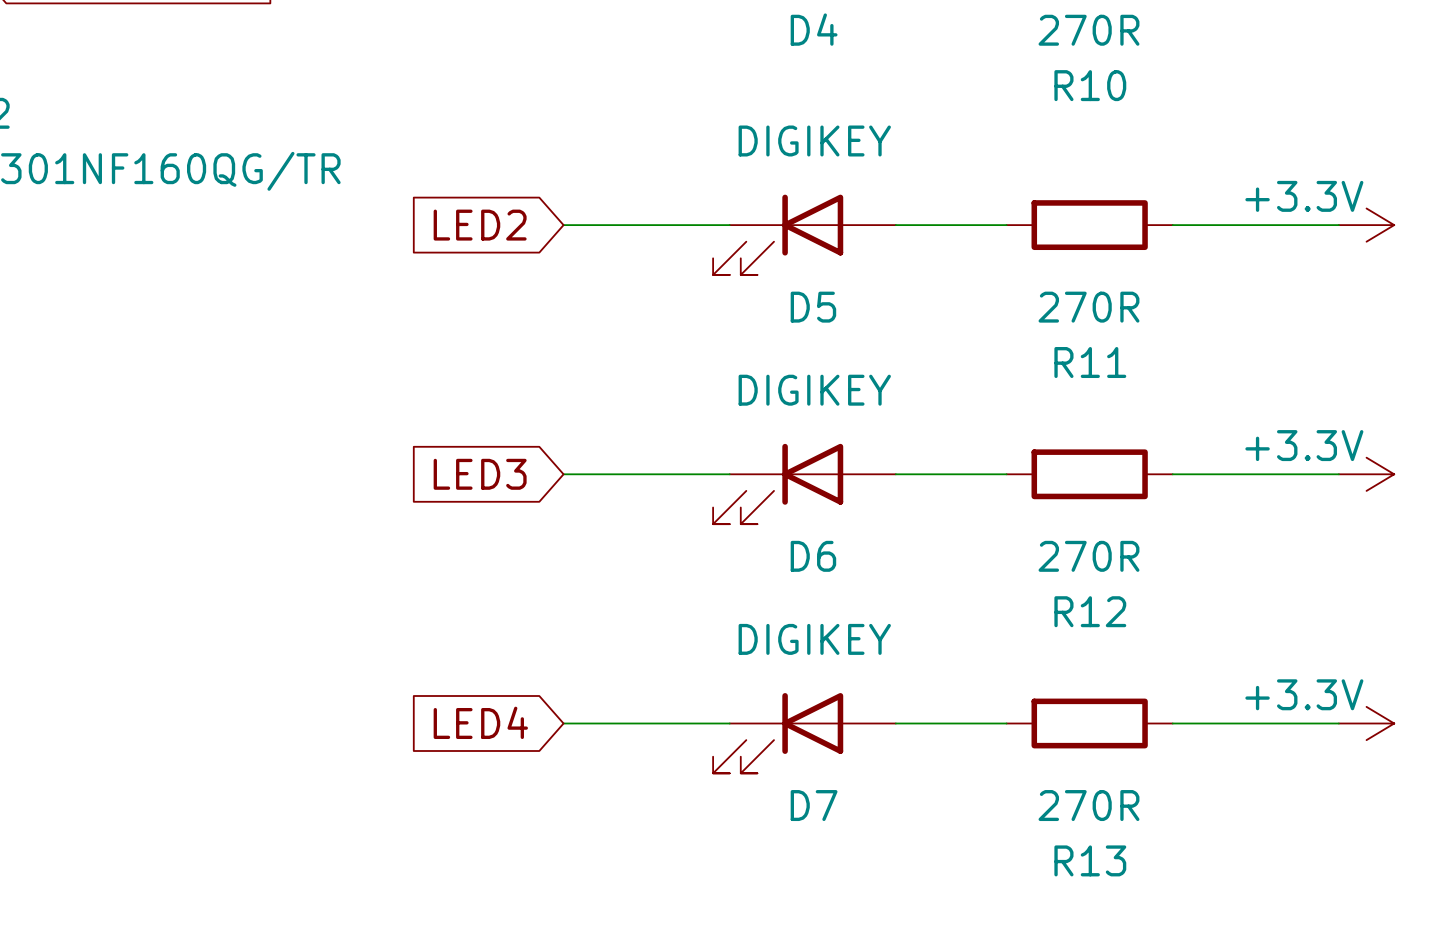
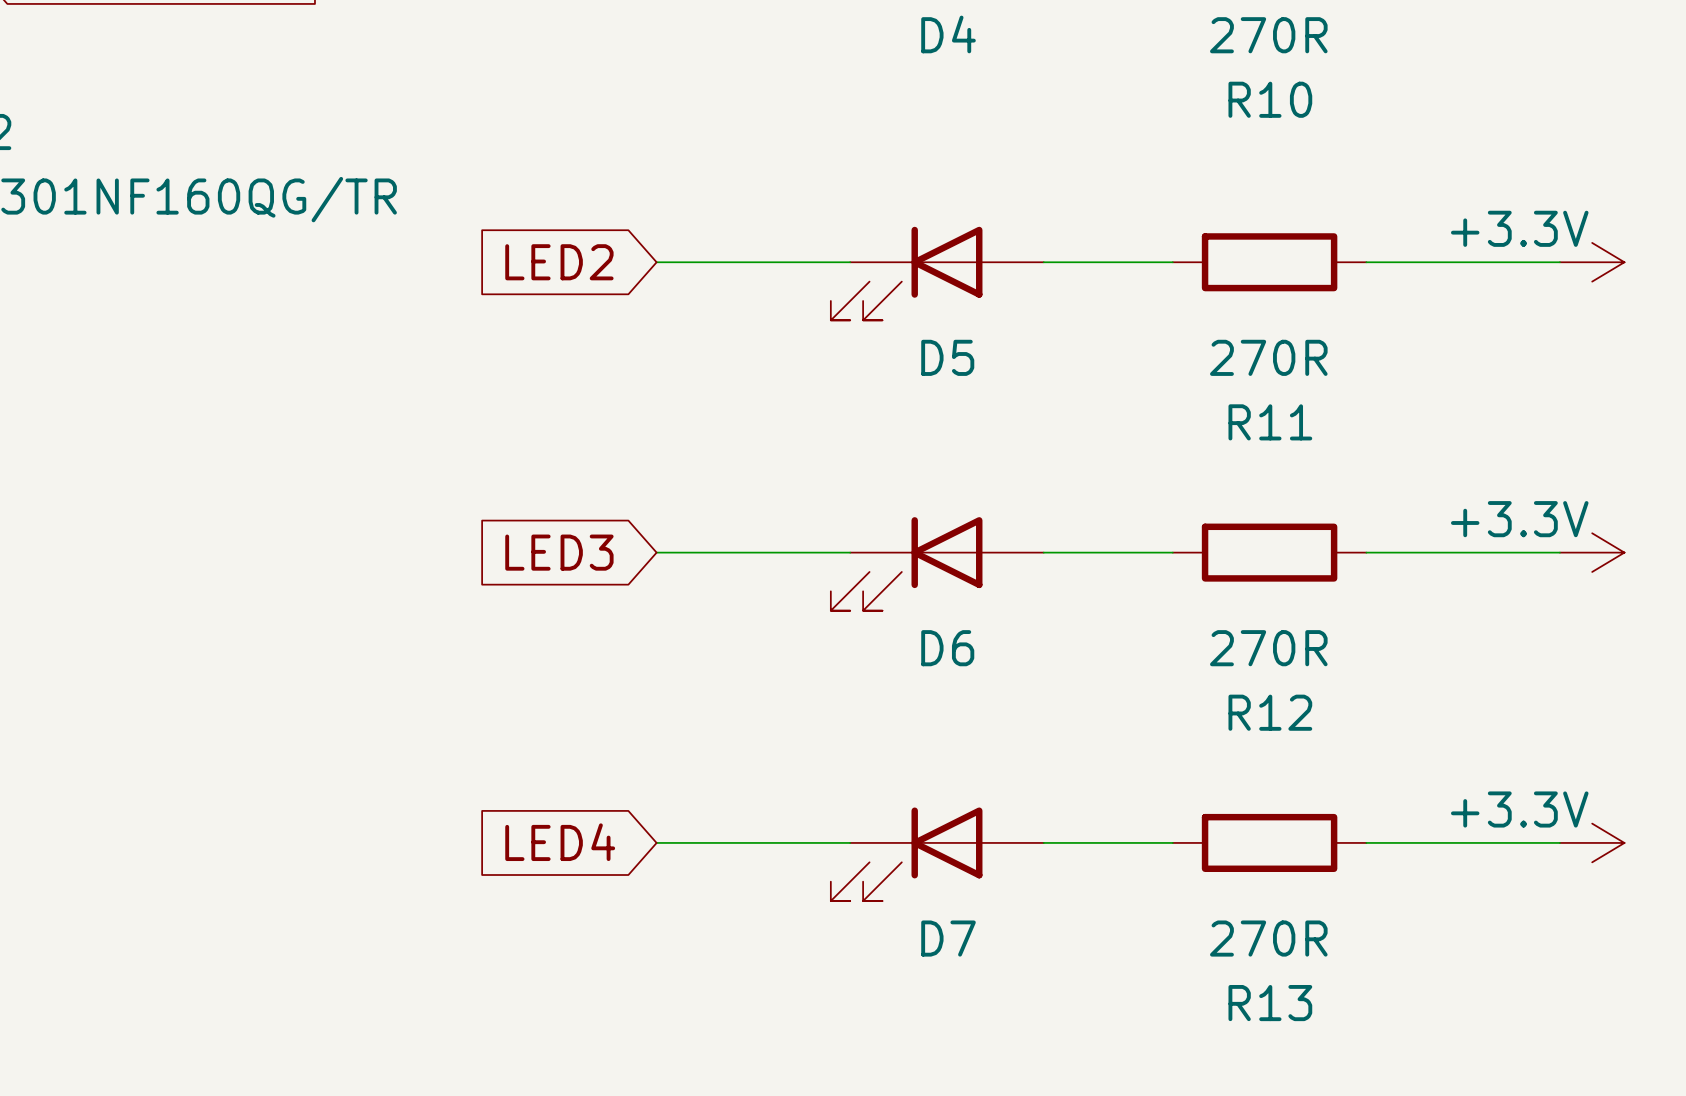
D5 text: DIGIKEY (814, 140) -> none
D6 text: DIGIKEY (814, 390) -> none
D7 text: DIGIKEY (814, 639) -> none

